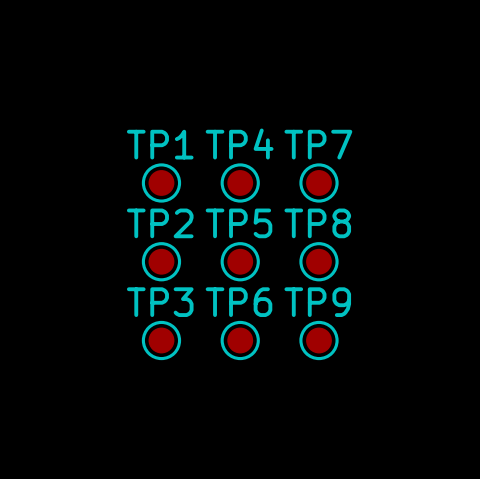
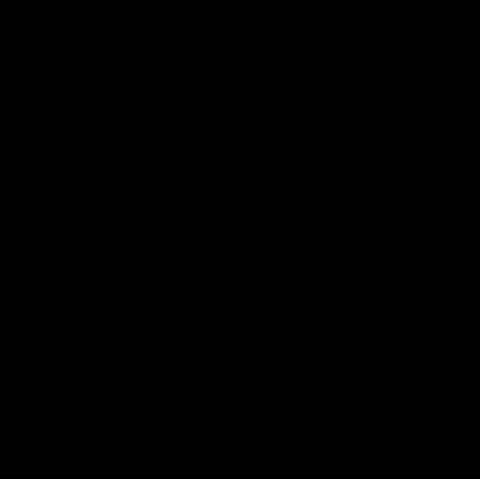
TP1: (161, 182) -> none
TP4: (240, 182) -> none
TP7: (318, 182) -> none
TP2: (161, 261) -> none
TP5: (240, 261) -> none
TP8: (318, 261) -> none
TP3: (161, 340) -> none
TP6: (240, 340) -> none
TP9: (318, 340) -> none

